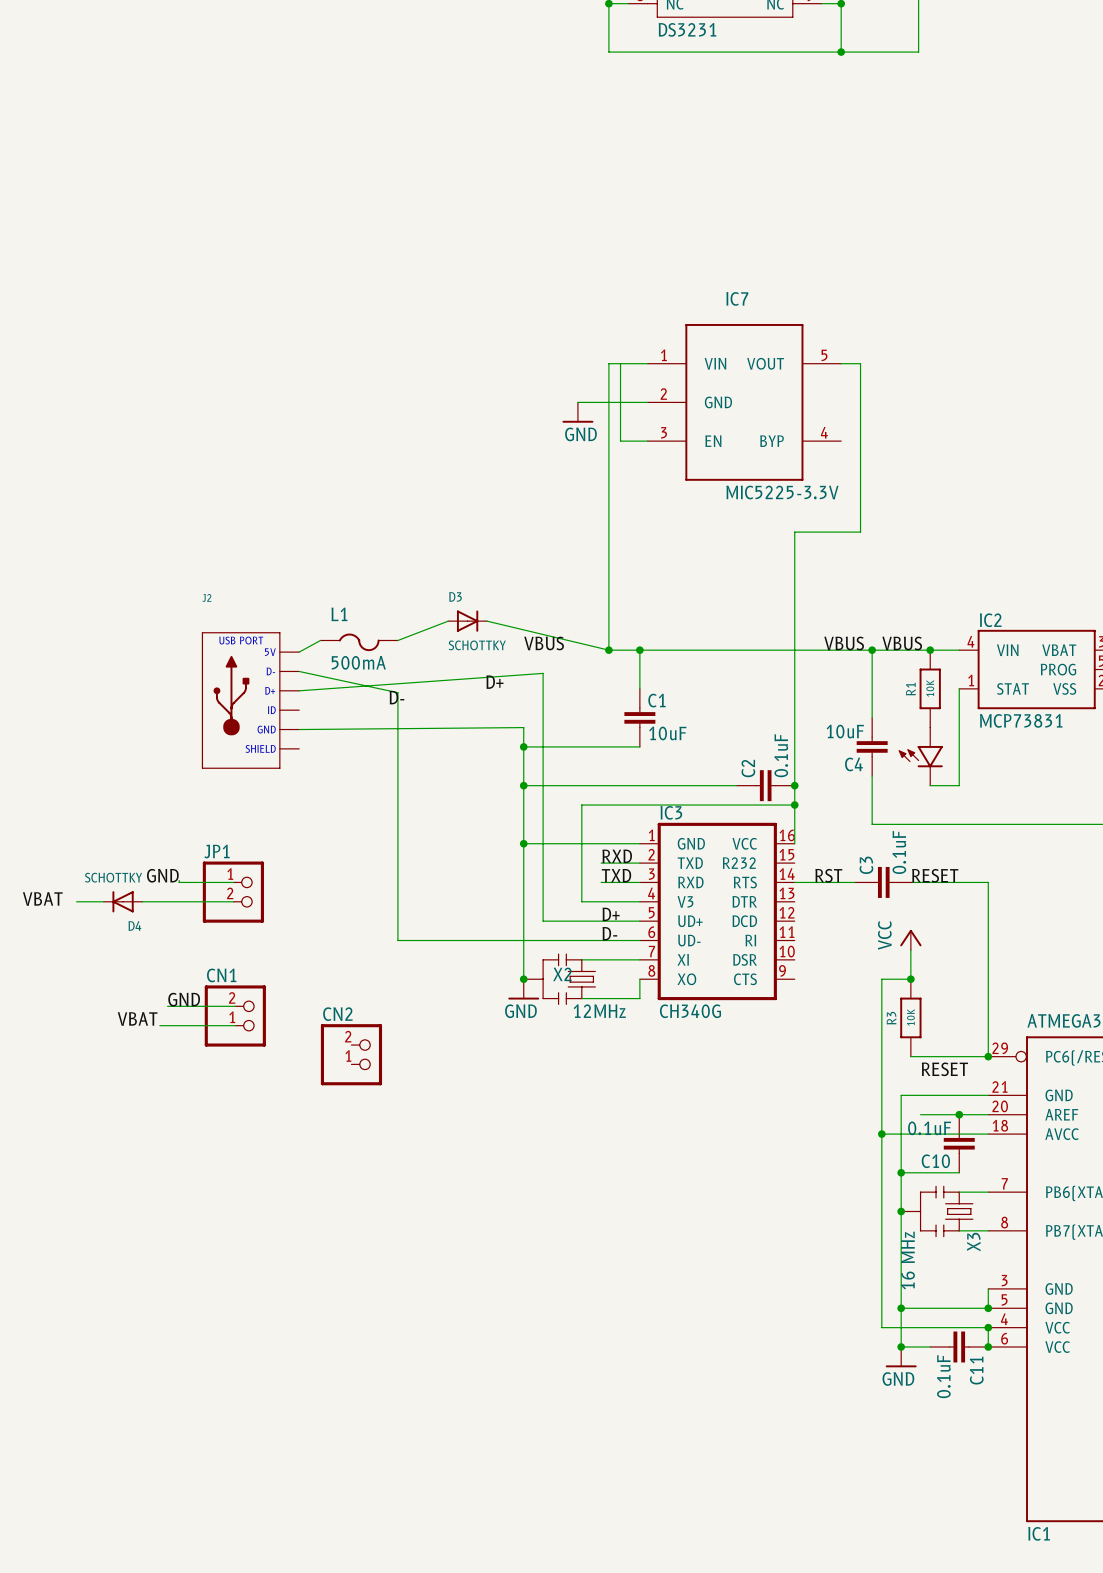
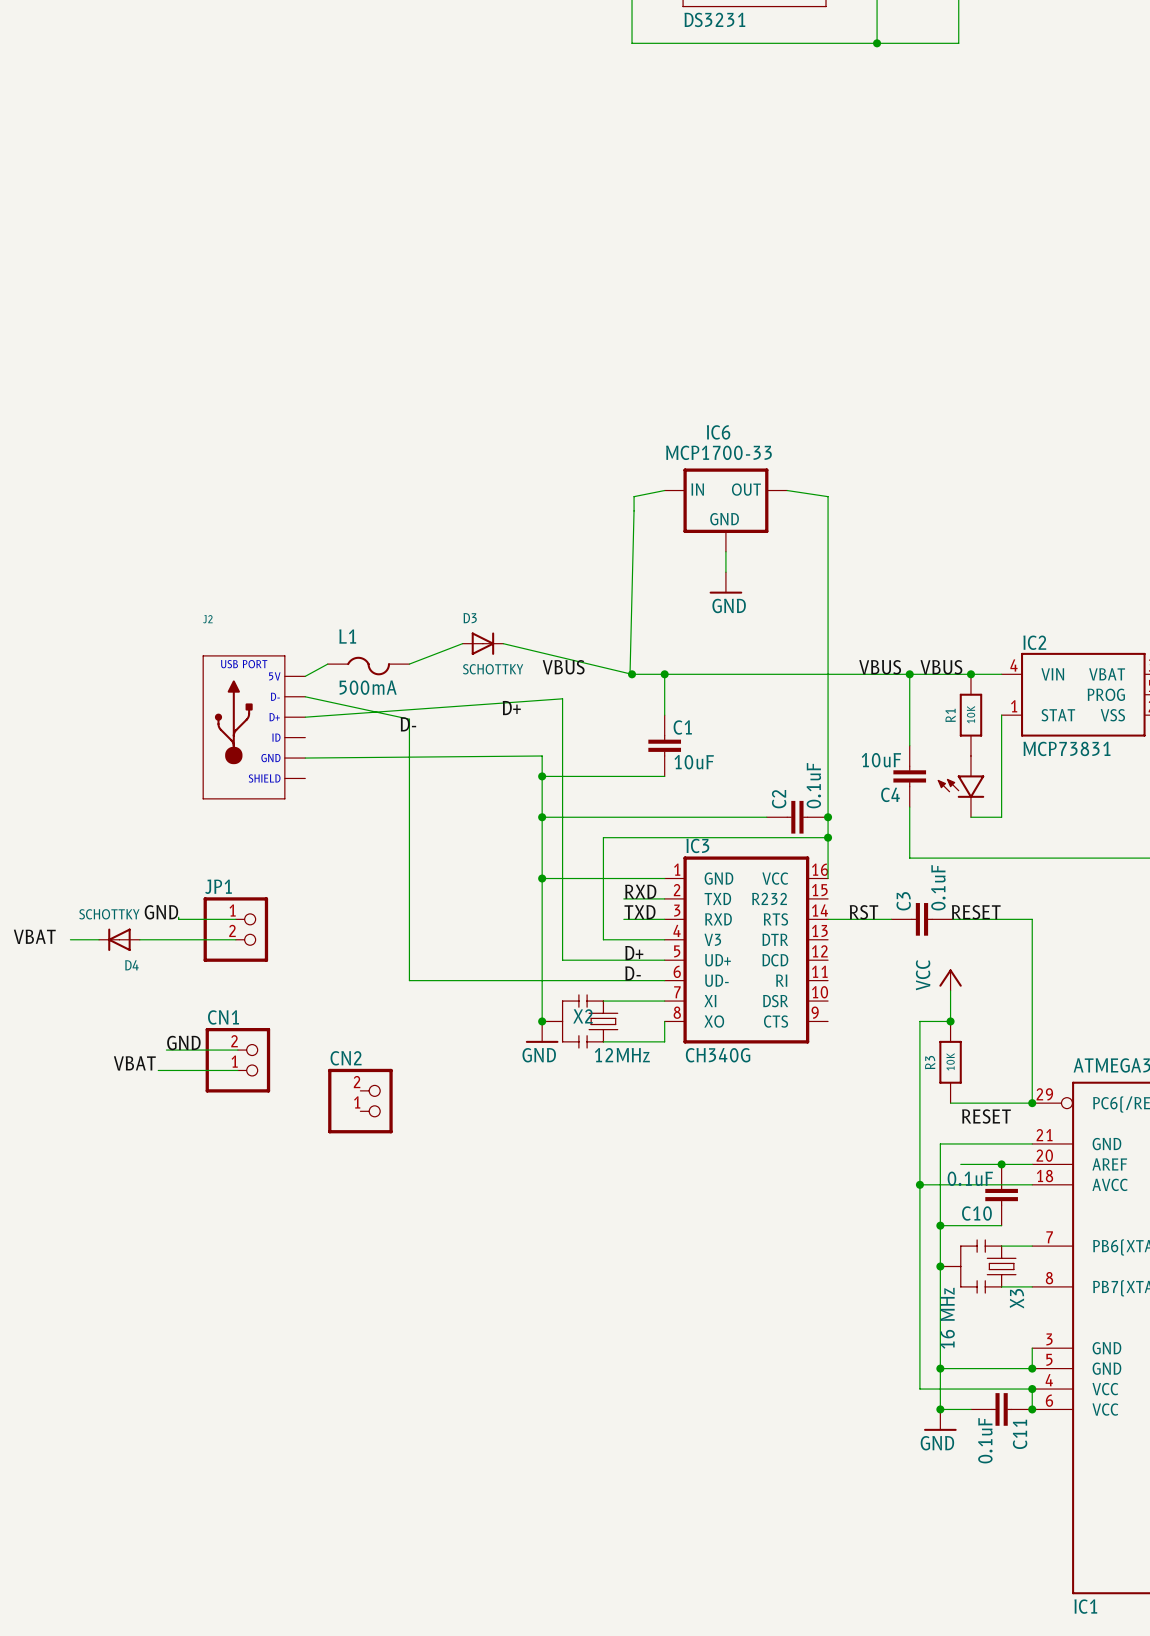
wire: (620, 363) (620, 441) (647, 441) -> none
wire: (647, 363) (608, 363) (608, 650) -> none
wire: (841, 363) (860, 363) (860, 532) (794, 532) -> (787, 490) (828, 496) (828, 549)
wire: (577, 402) (647, 402) -> none
IC7: MIC5225-3.3V (744, 402) -> none
power symbol: GND (577, 412) -> none
wire: none -> (664, 490) (634, 496) (629, 676)
IC6: none -> MCP1700-33 (725, 510)
wire: none -> (725, 551) (725, 572)
power symbol: none -> GND (725, 582)

